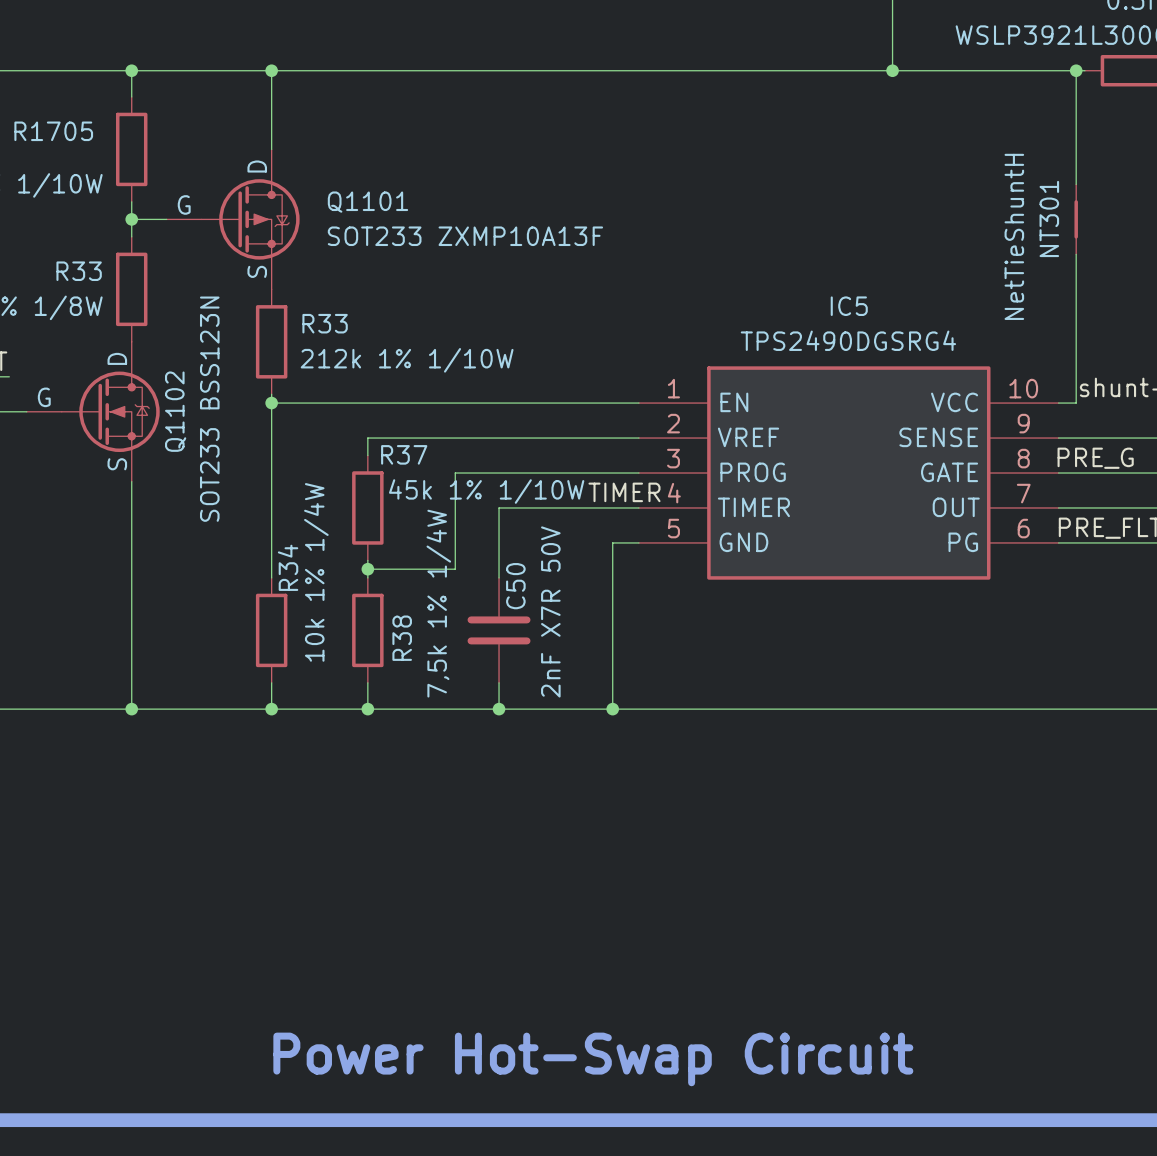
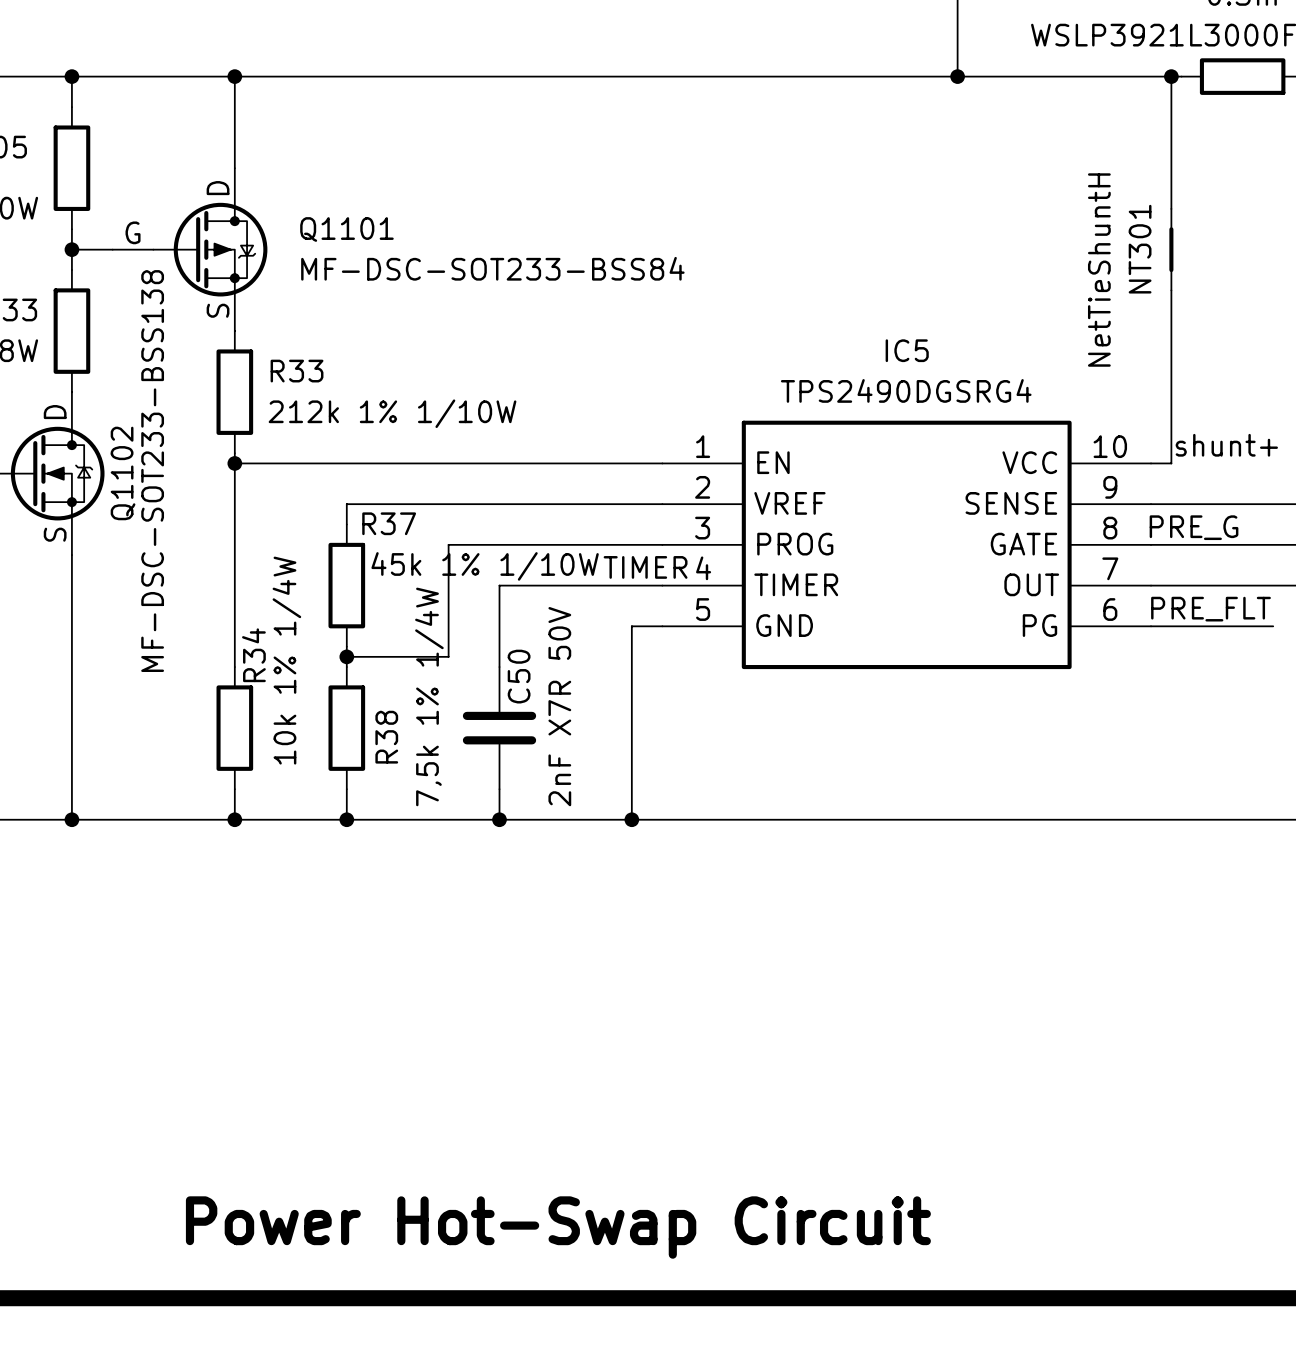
Q1101 value: SOT233 ZXMP10A13F (465, 236) -> MF-DSC-SOT233-BSS84 (492, 268)
Q1102 value: SOT233 BSS123N (209, 409) -> MF-DSC-SOT233-BSS138 (152, 471)
text position: Power Hot-Swap Circuit (593, 1059) -> Power Hot-Swap Circuit (558, 1227)

